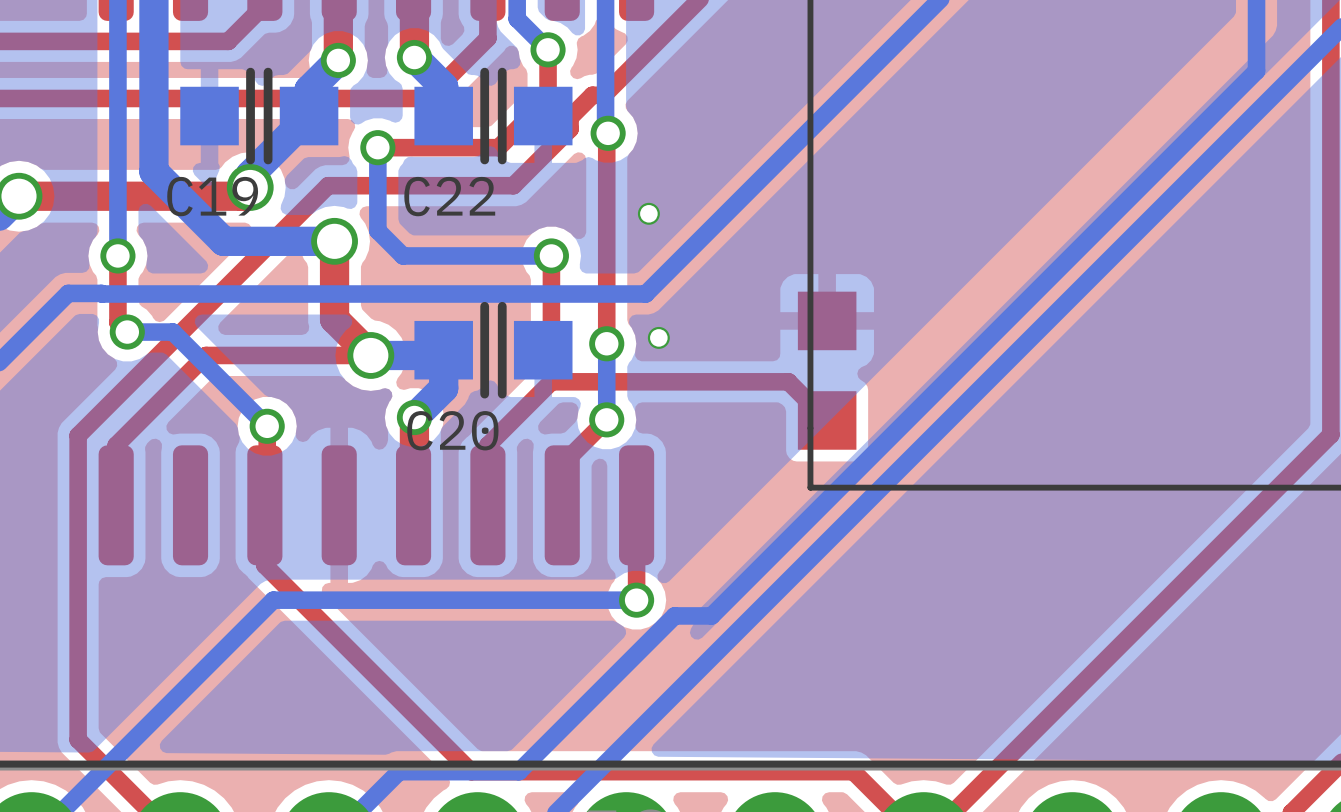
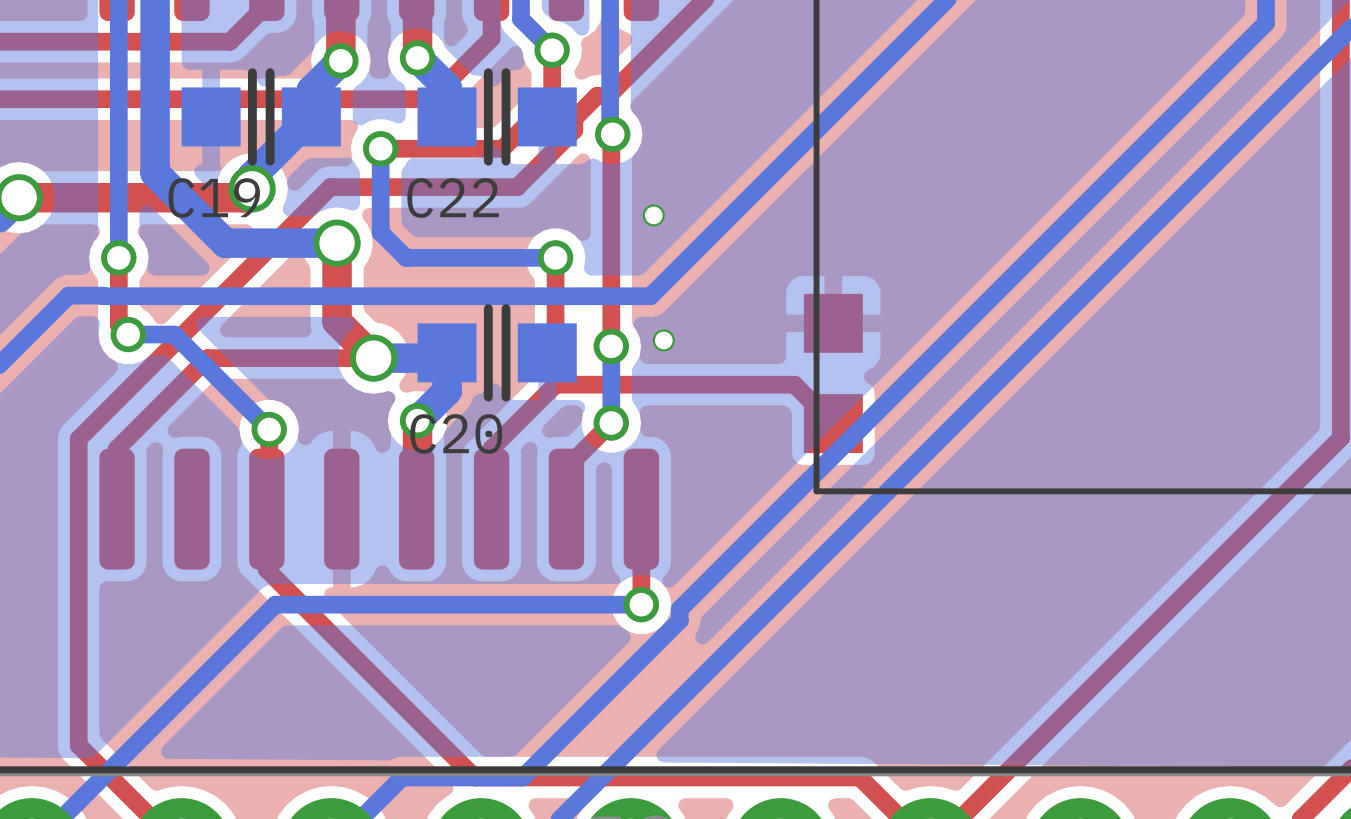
bottom track: (1256, 22) (1256, 71) (711, 615) (674, 615) -> (1265, 23) (679, 609) (679, 620)

